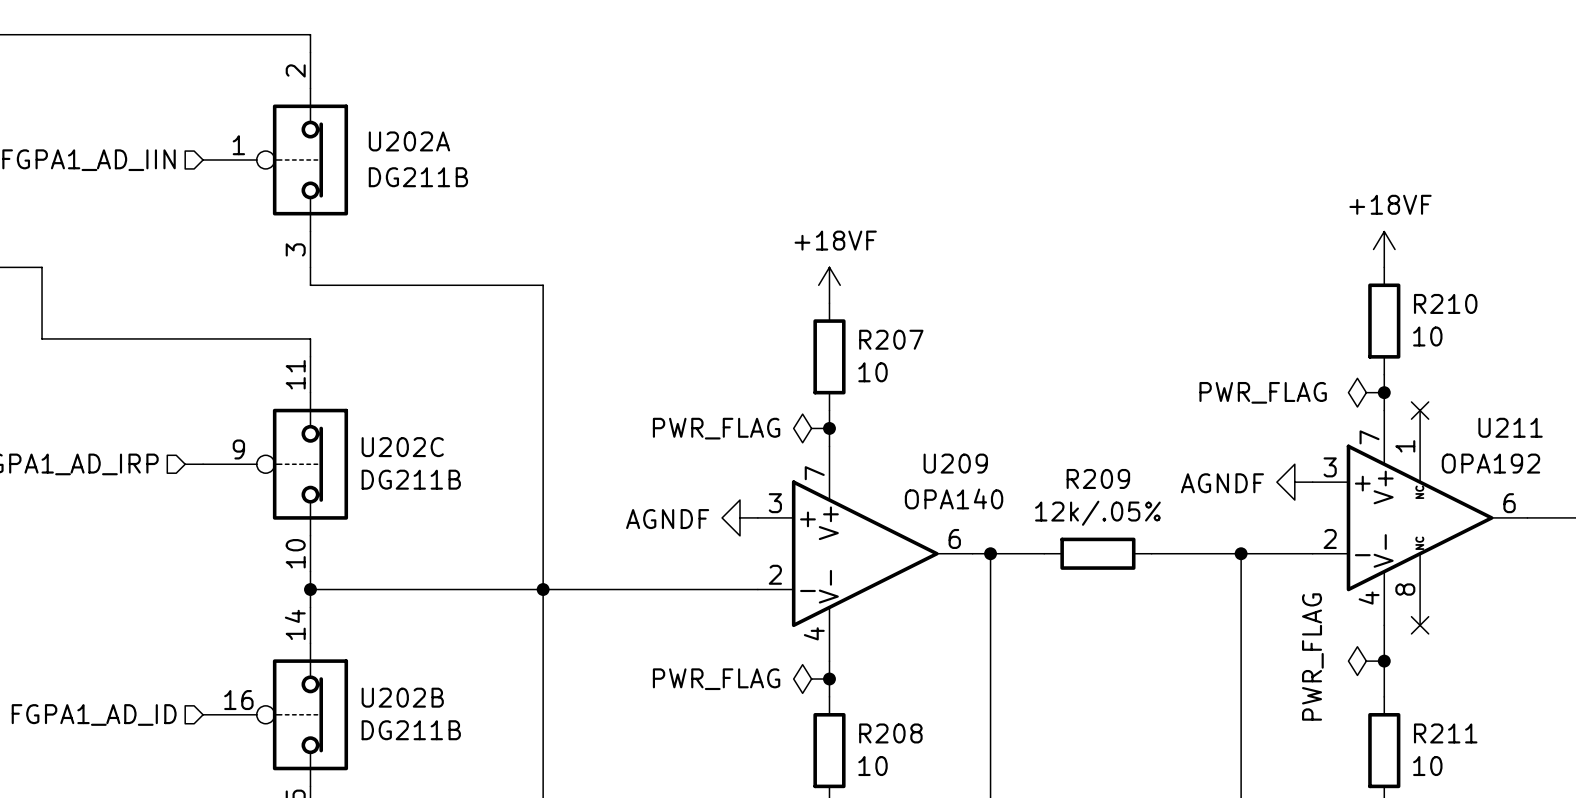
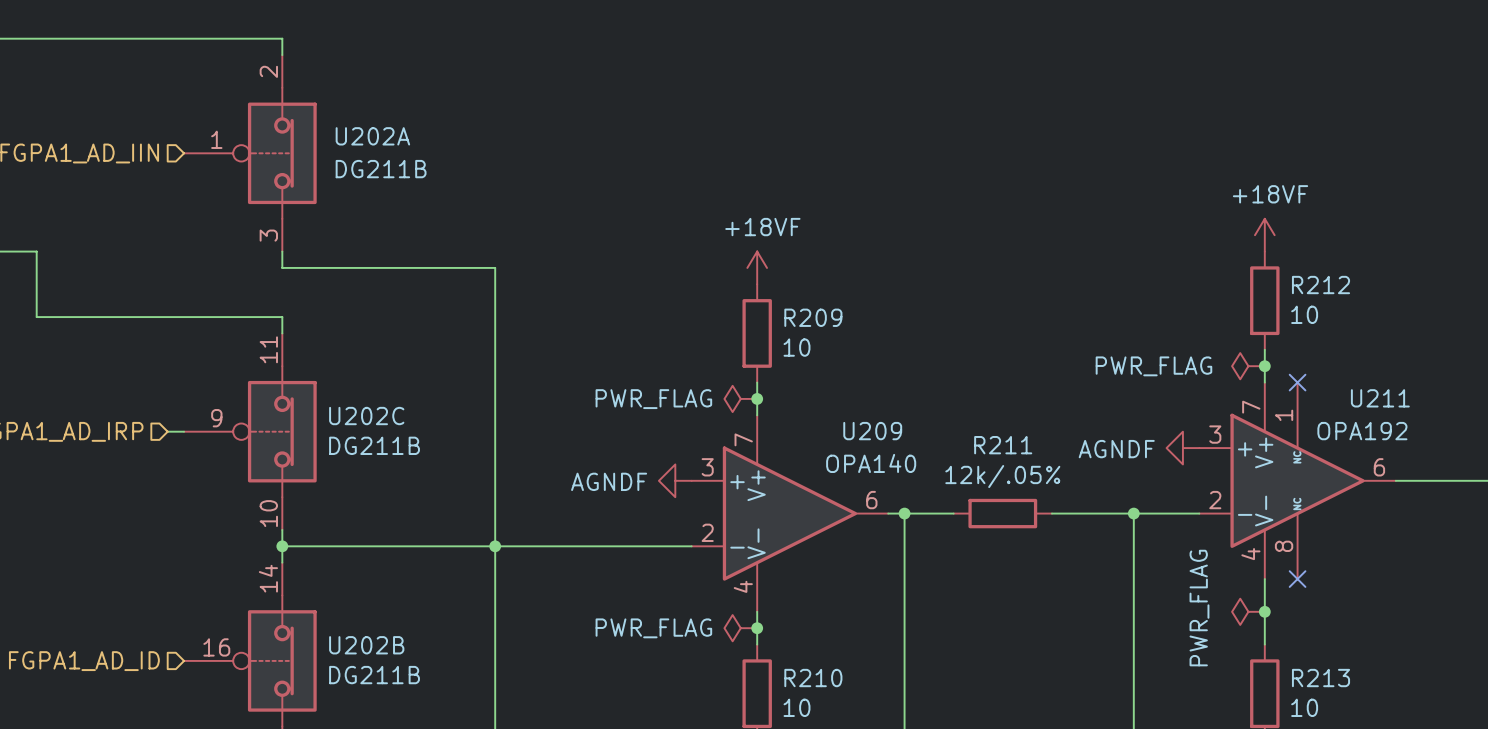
R210 name: R210 (1445, 303) -> R212 (1321, 285)
R207 name: R207 (891, 339) -> R209 (813, 317)
R209 name: R209 (1098, 478) -> R211 (1003, 445)
R208 name: R208 (890, 733) -> R210 (813, 678)
R211 name: R211 (1445, 733) -> R213 (1321, 678)

